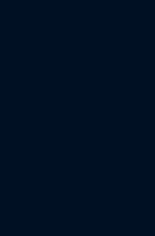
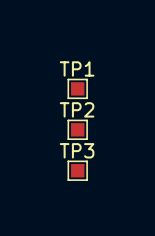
TP1: none -> (77, 88)
TP2: none -> (77, 129)
TP3: none -> (77, 170)

